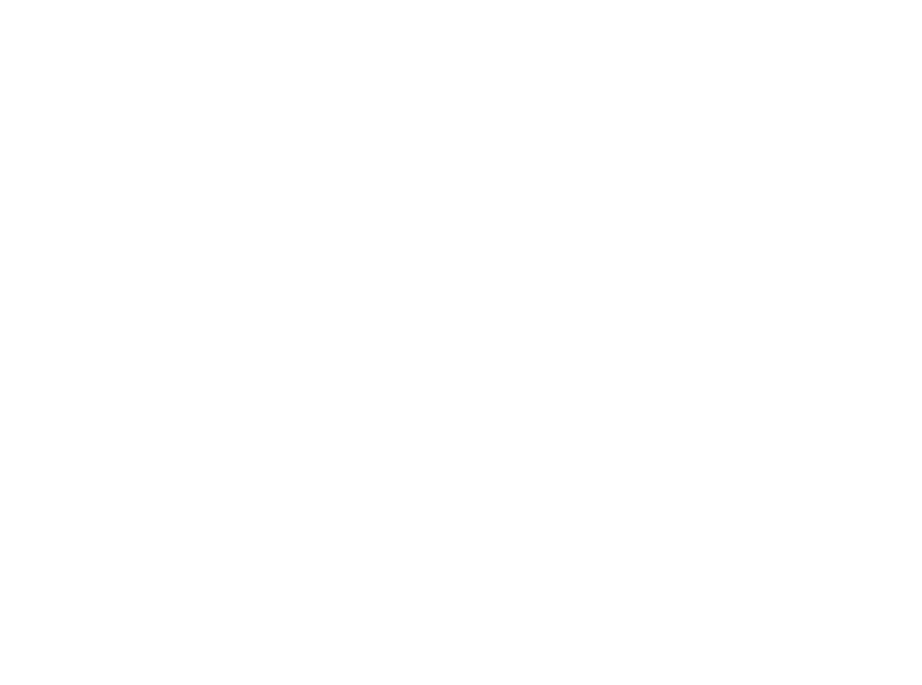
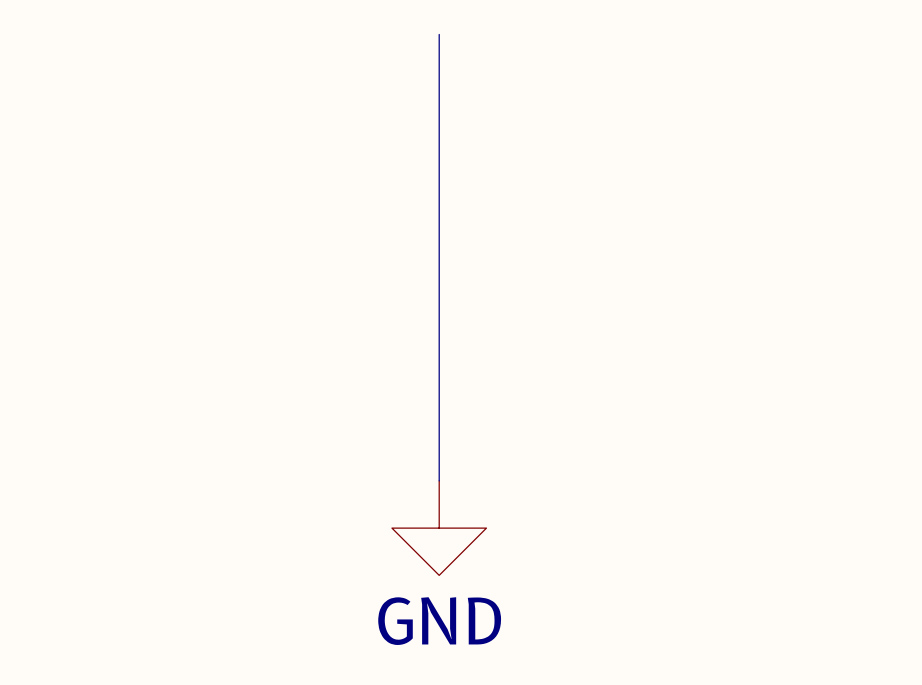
wire: none -> (439, 34) (439, 480)
power symbol: none -> GND (439, 528)

